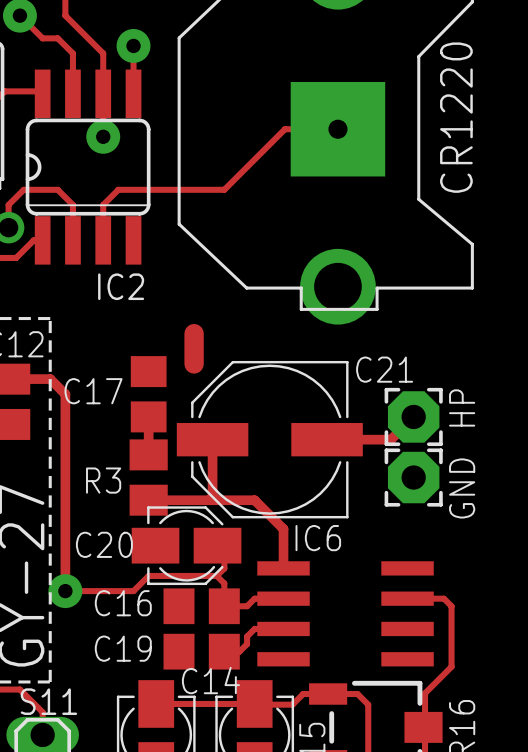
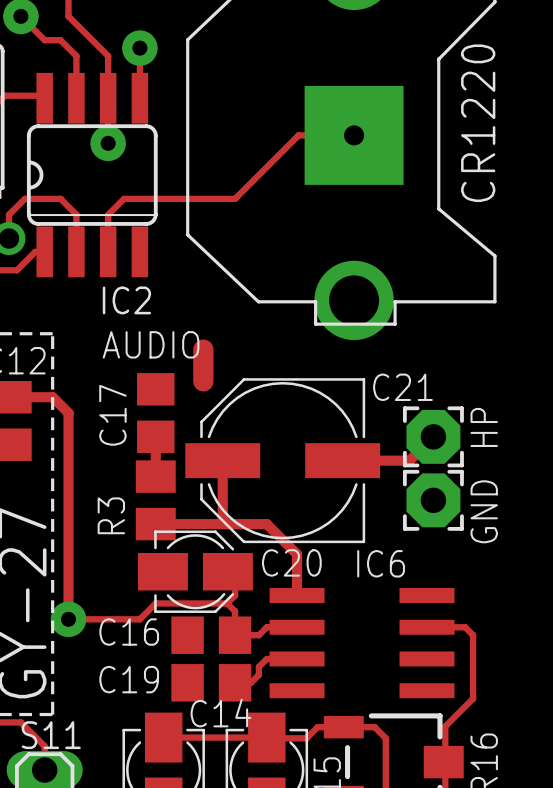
text: none -> AUDIO (151, 344)
C17 name rotation: 0° (93, 391) -> 90° counterclockwise (112, 415)
R3 name rotation: 0° (103, 480) -> 90° counterclockwise (111, 515)
IC6 name position: IC6 (318, 538) -> IC6 (381, 563)
C20 name position: C20 (104, 544) -> C20 (291, 562)

